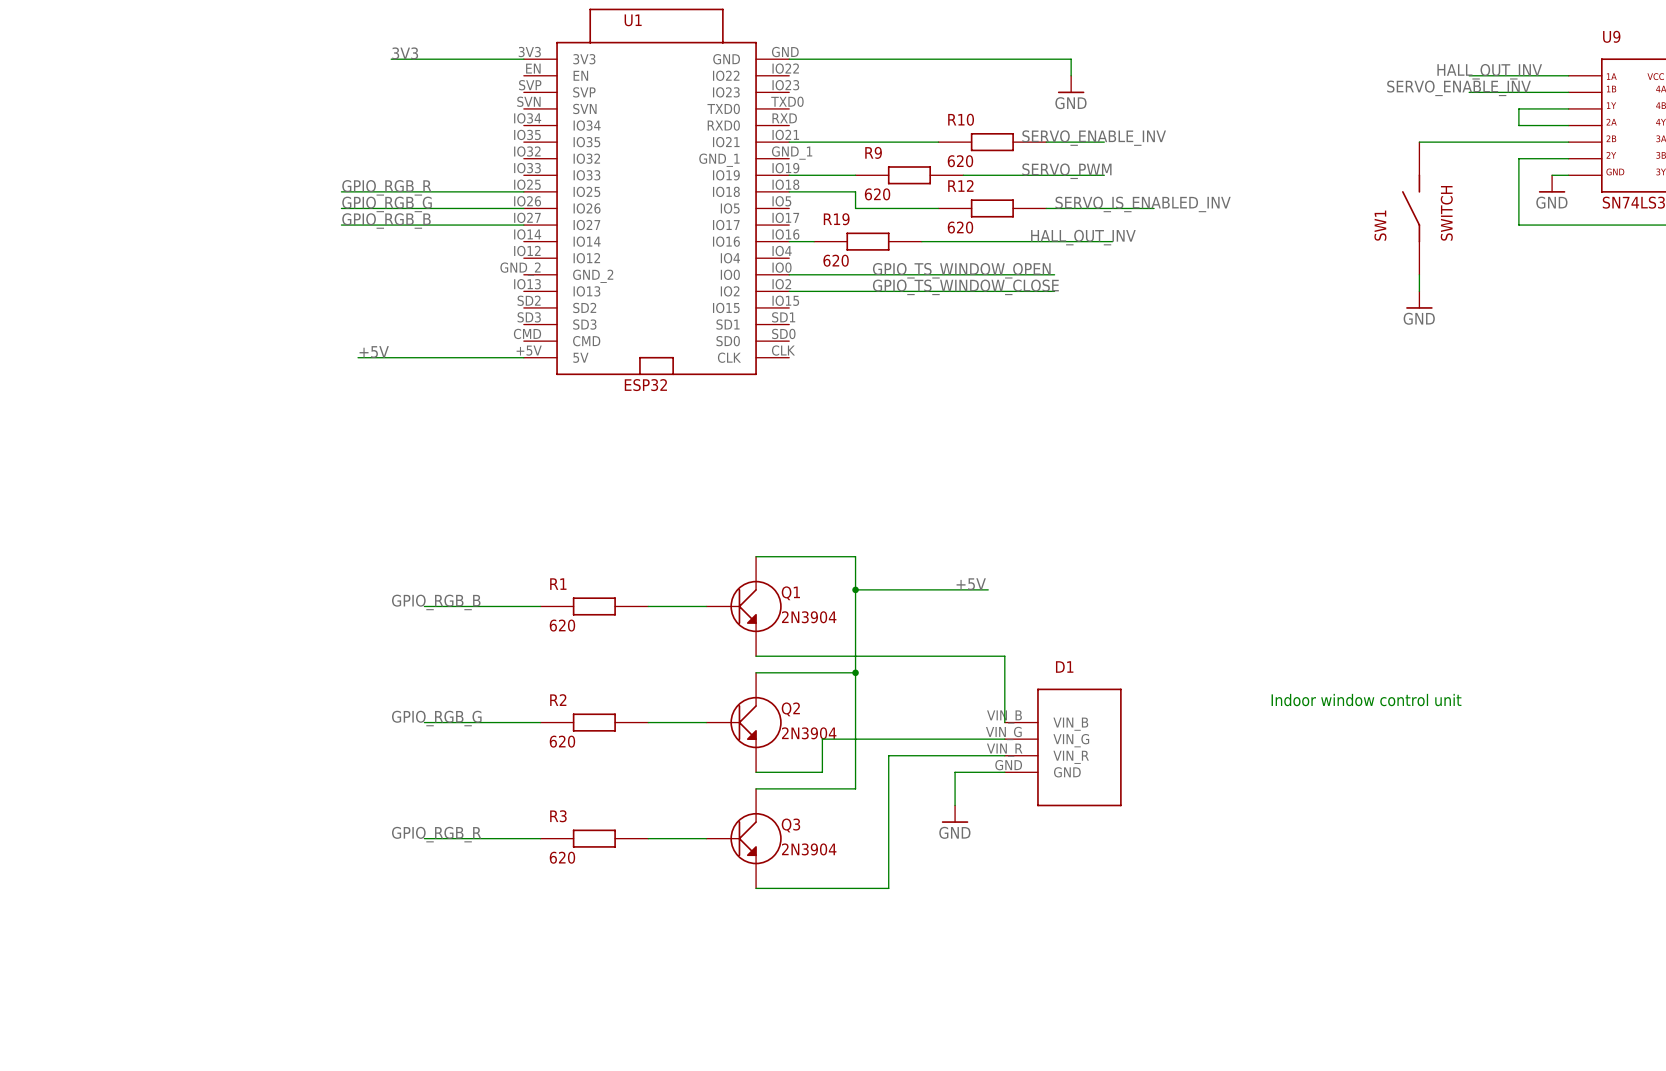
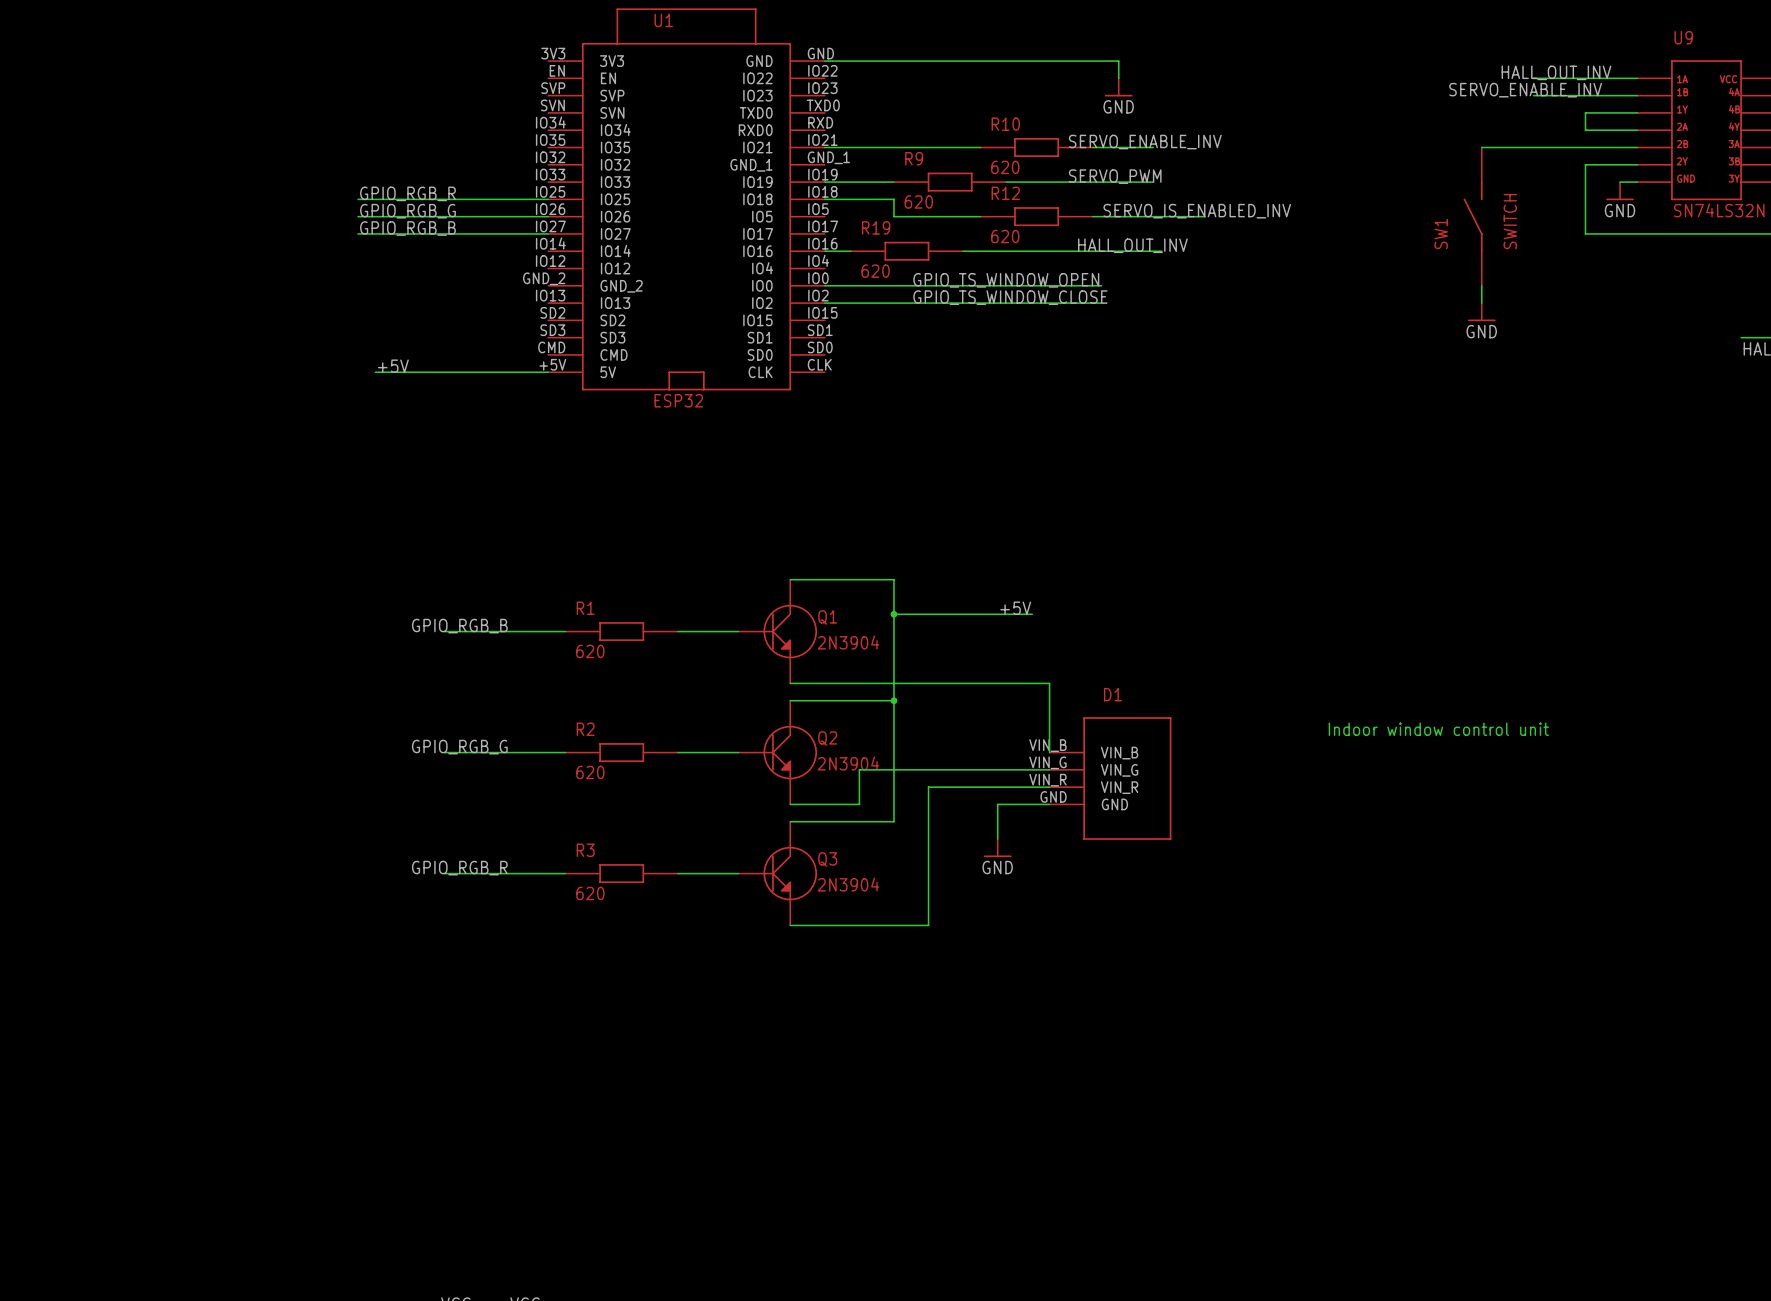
label: 3V3 (405, 53) -> none
wire: (391, 59) (523, 59) -> none

